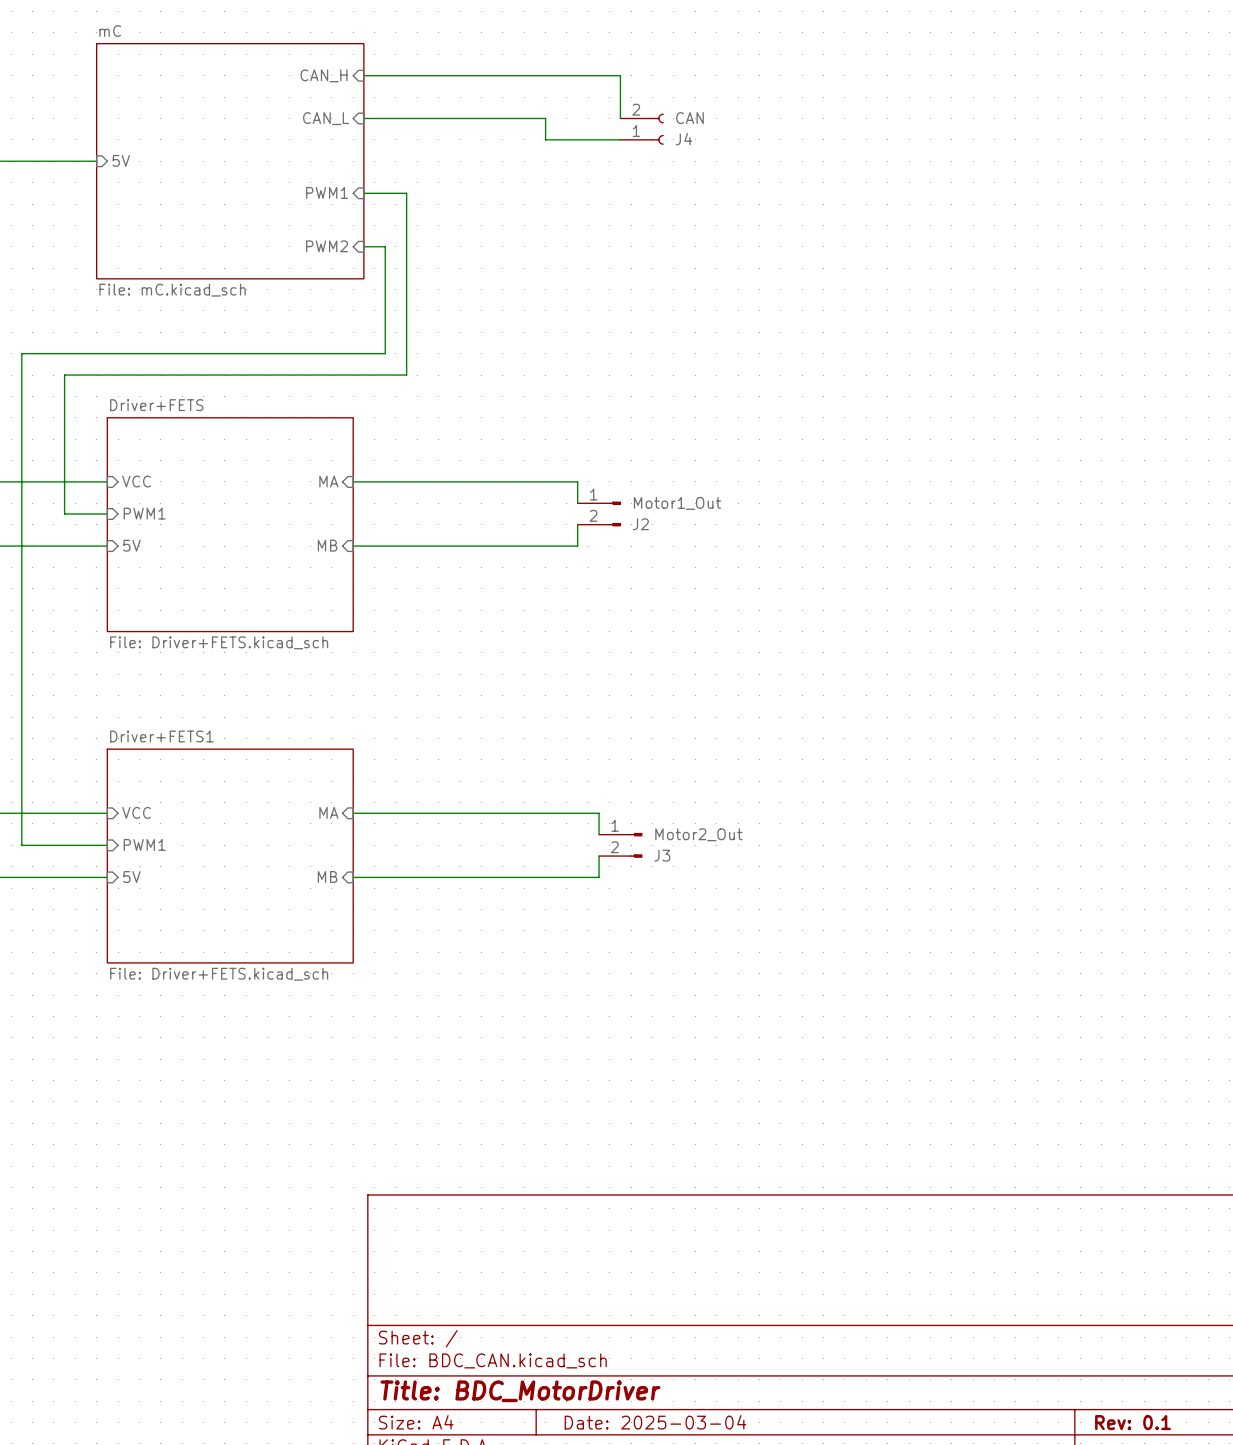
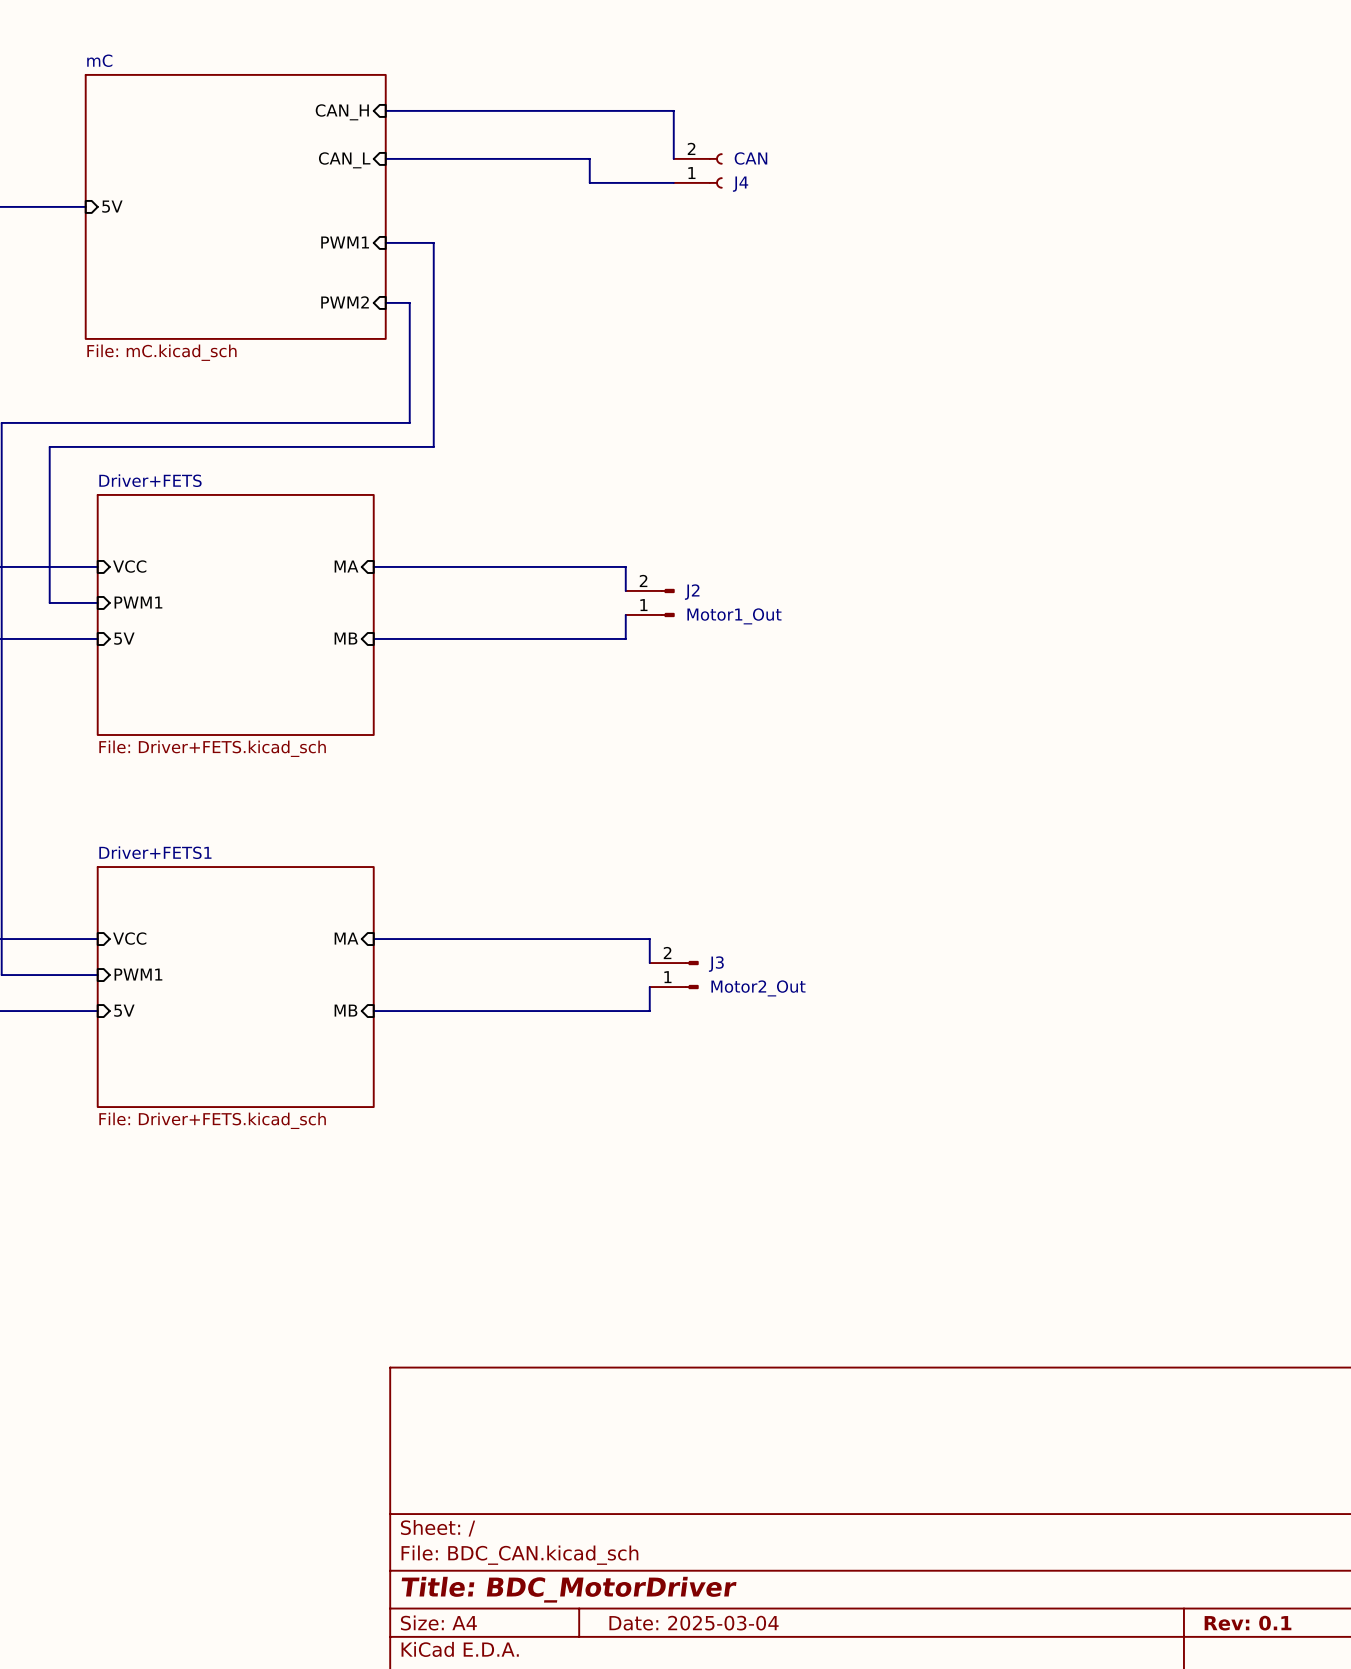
J2 flip: as is (615, 513) -> up-down (667, 602)
J3 flip: as is (636, 845) -> up-down (691, 975)

